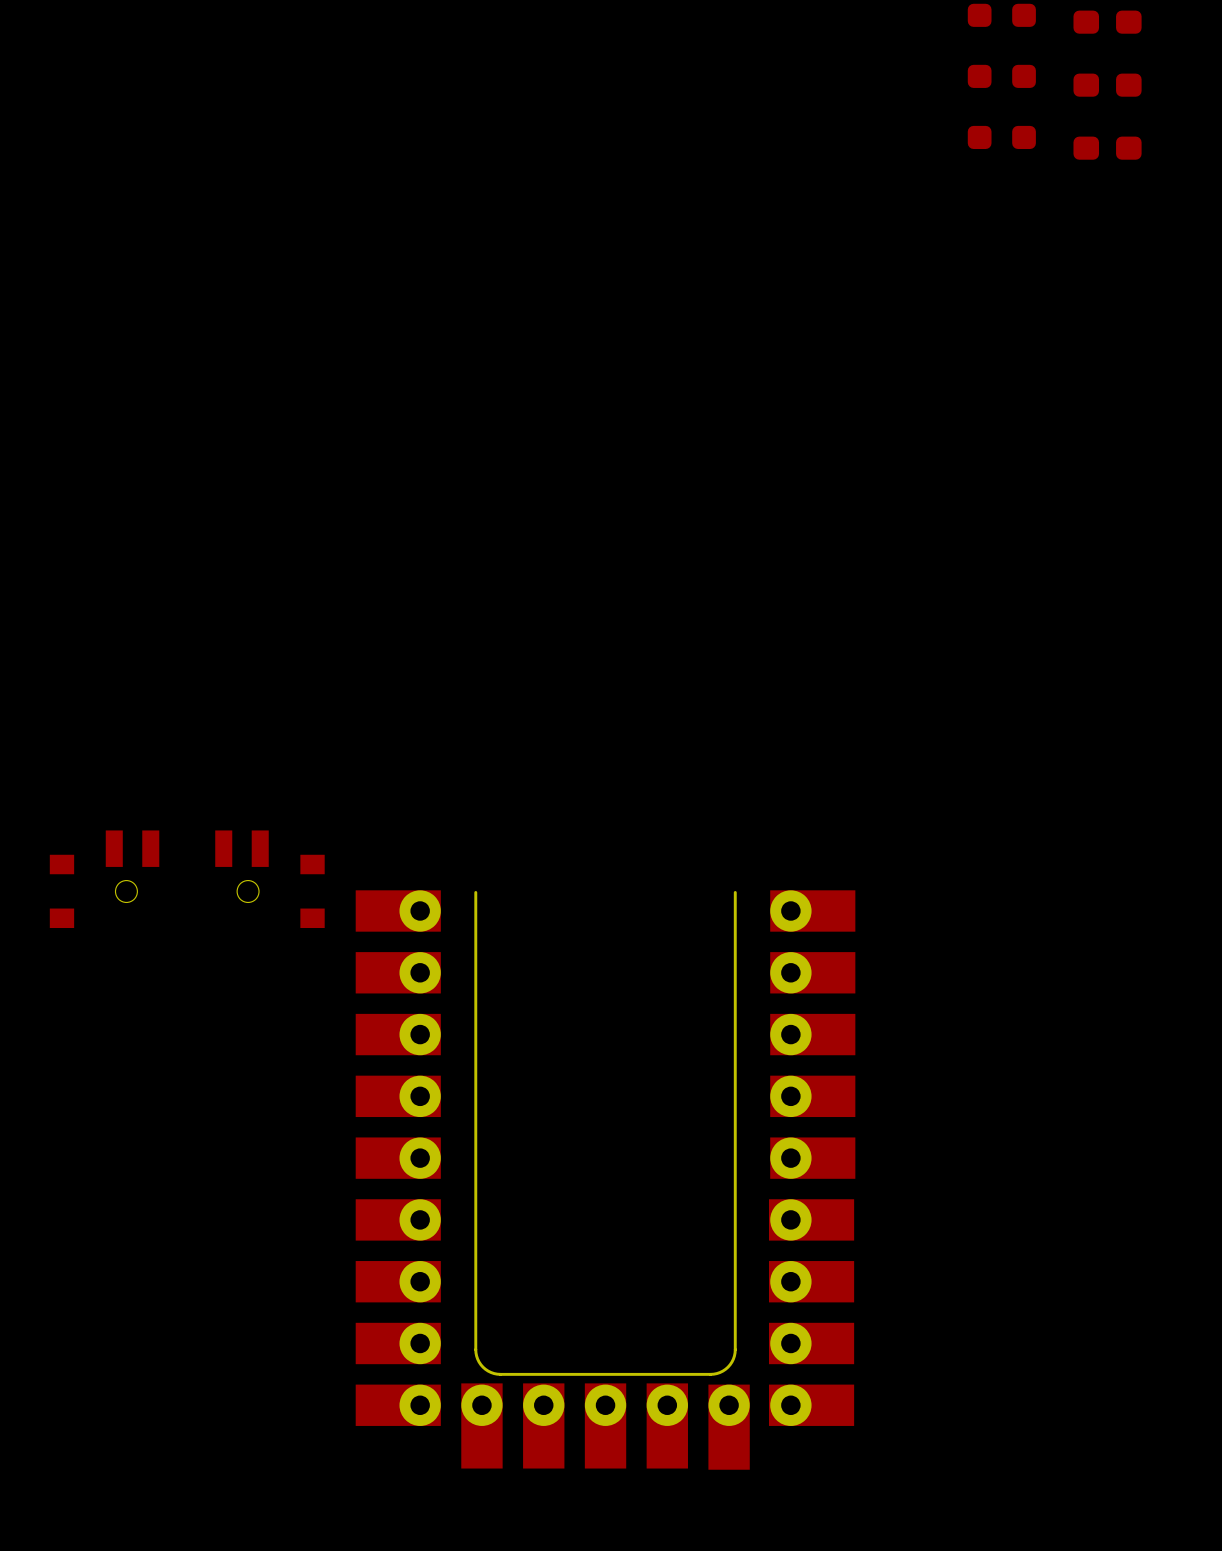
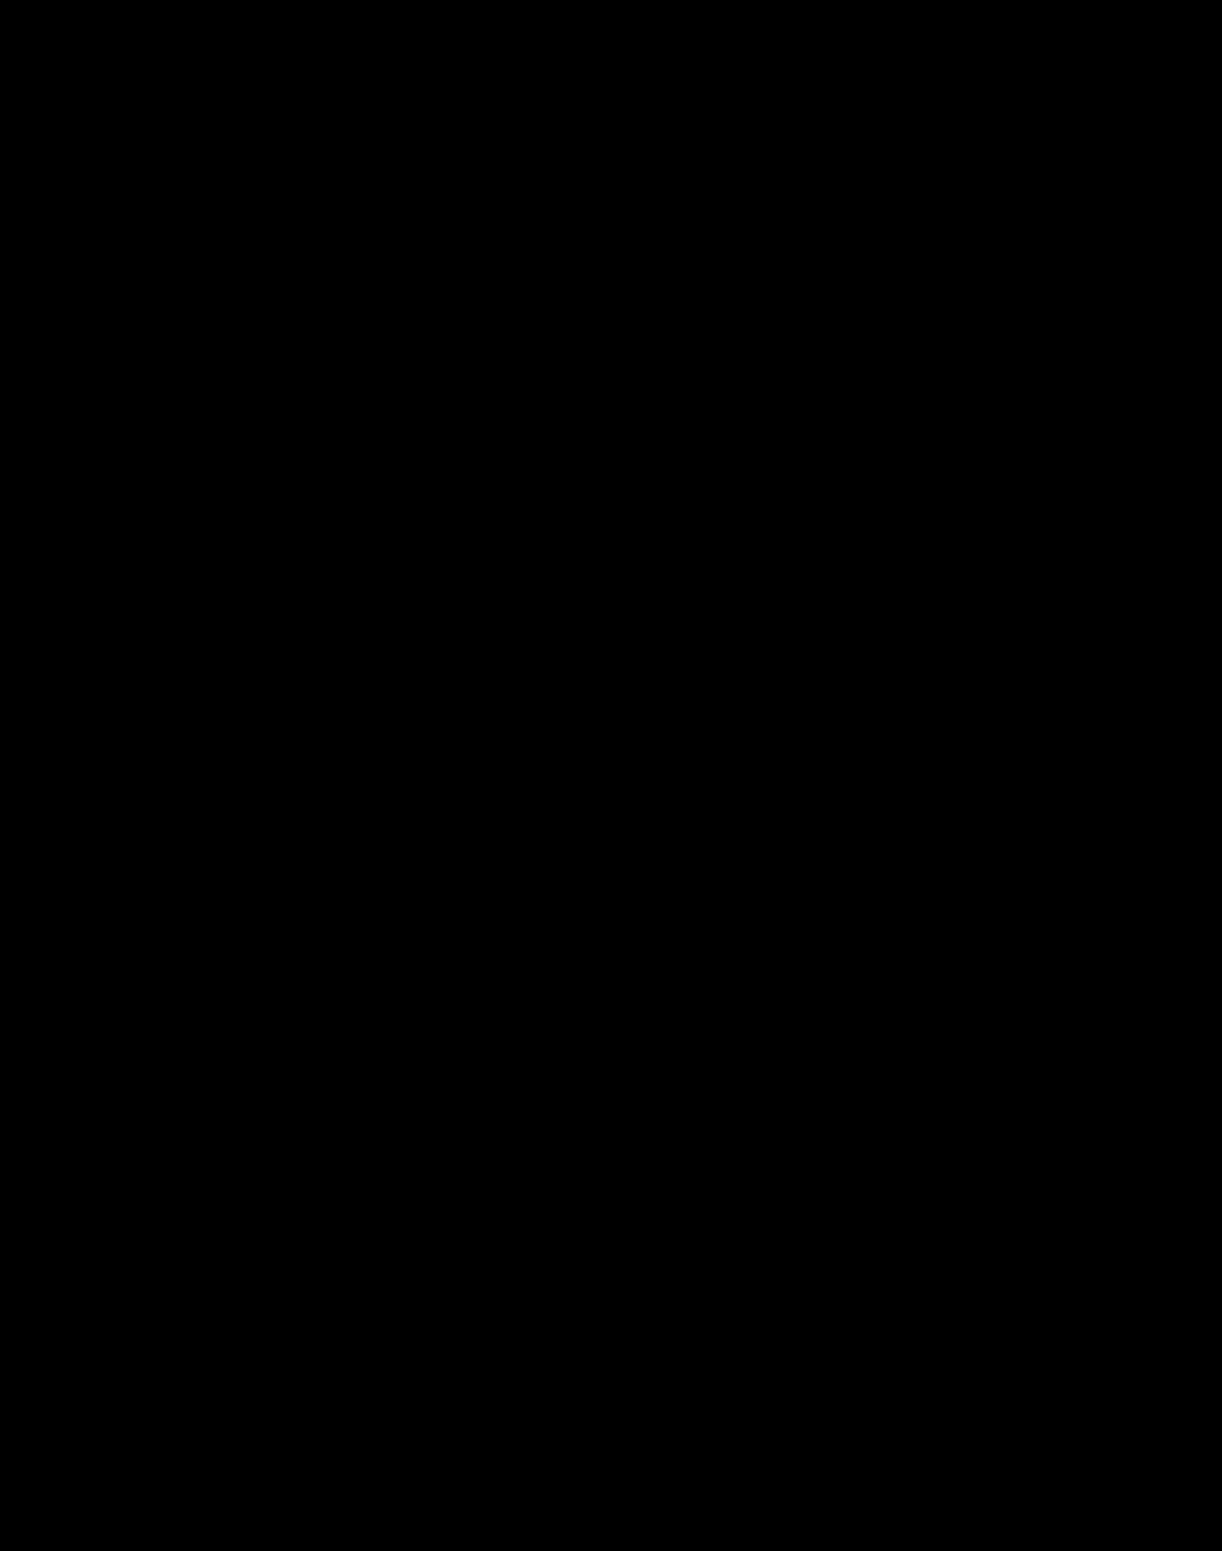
part: (1001, 15) -> none
part: (1107, 22) -> none
part: (1001, 76) -> none
part: (1107, 85) -> none
part: (1001, 137) -> none
part: (1107, 148) -> none
part: (187, 879) -> none
part: (605, 1180) -> none

